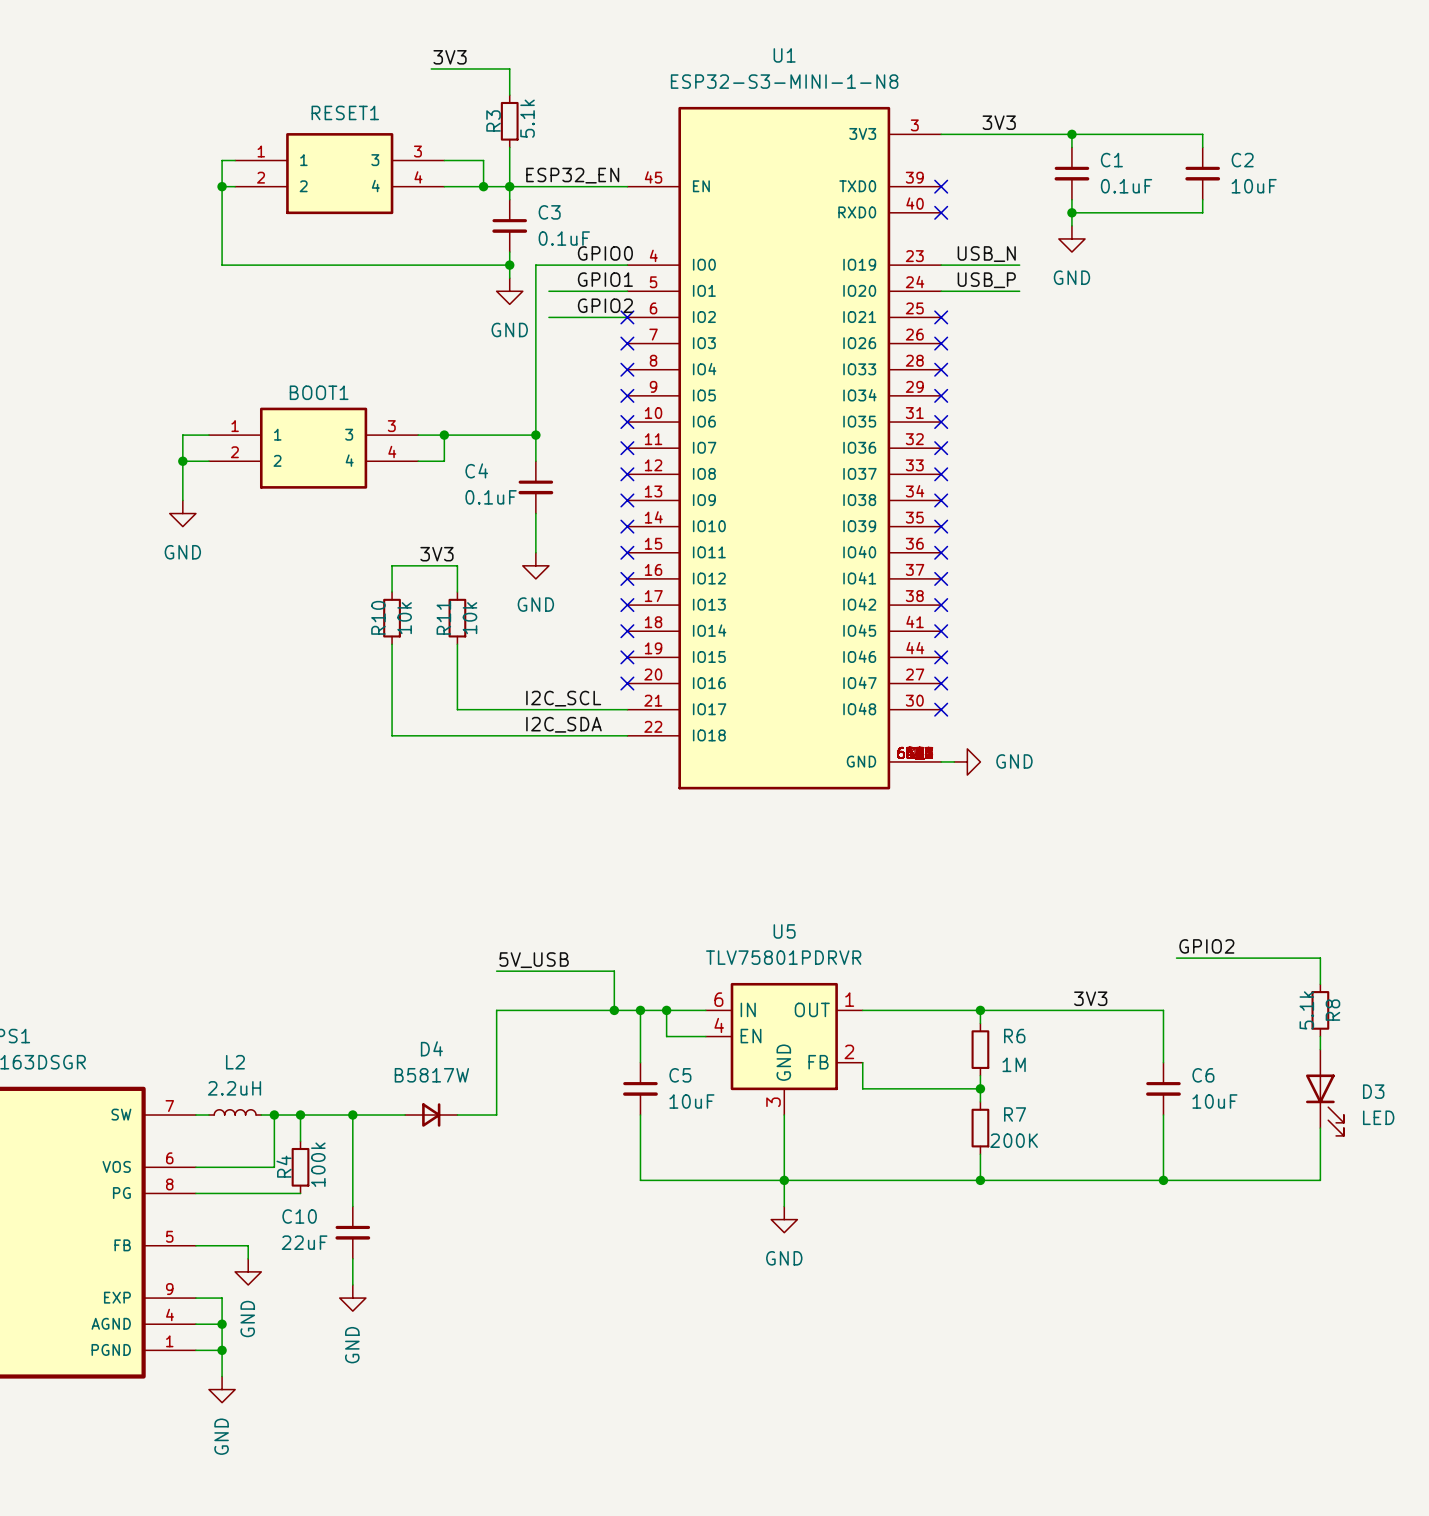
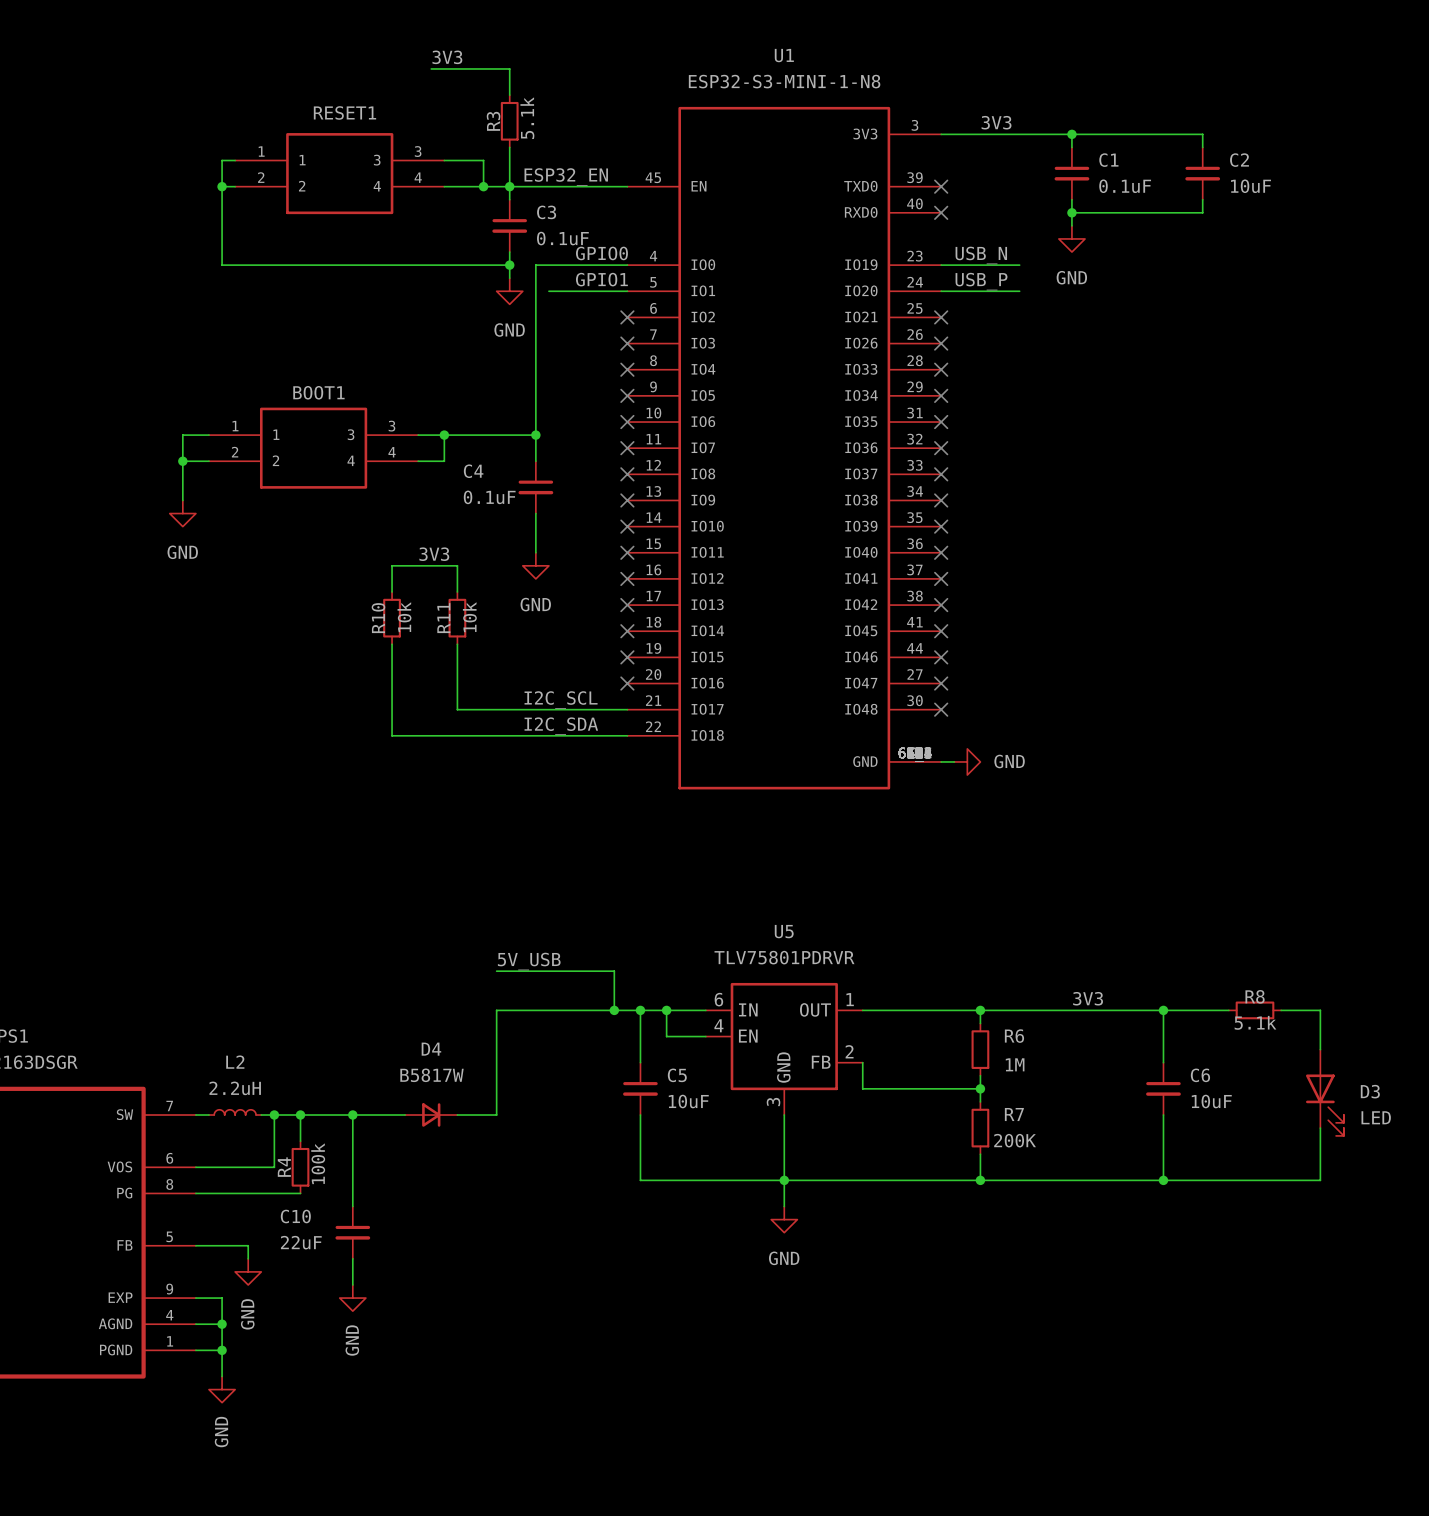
label: GPIO2 (605, 305) -> none
wire: (548, 317) (627, 317) -> none
label: GPIO2 (1206, 946) -> none
wire: (1176, 958) (1320, 958) (1320, 984) -> none
wire: none -> (1163, 1010) (1228, 1010)
junction: none -> (1163, 1010)
wire: none -> (1281, 1010) (1320, 1010) (1320, 1036)
R8 rotation: 0° (1320, 1010) -> 90° clockwise (1255, 1010)
R8 position: (1320, 1010) -> (1255, 1010)

